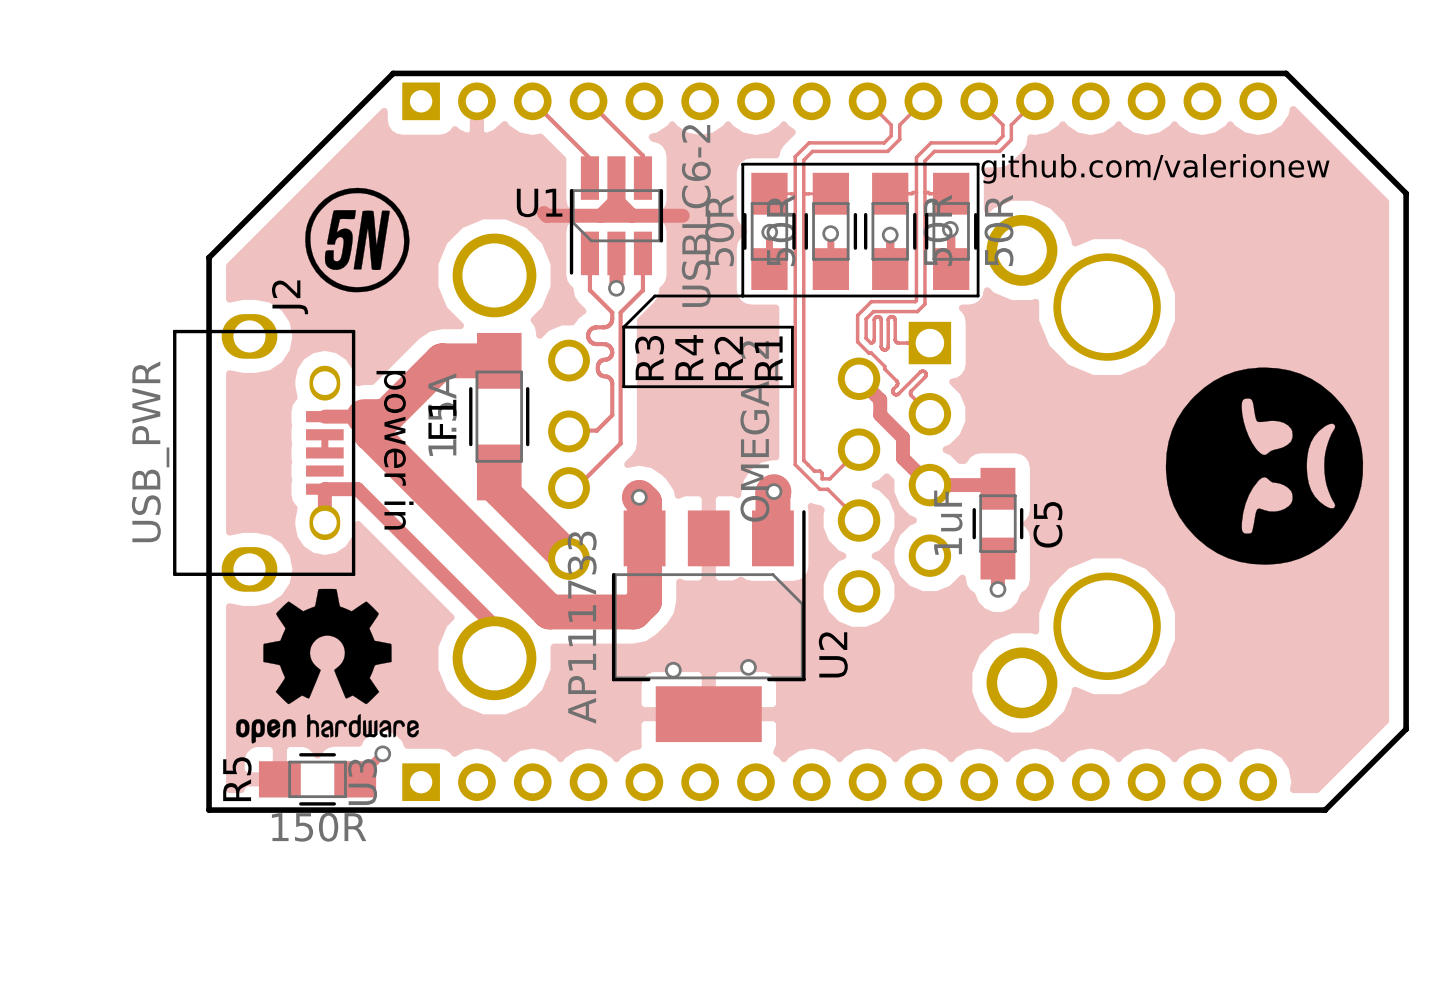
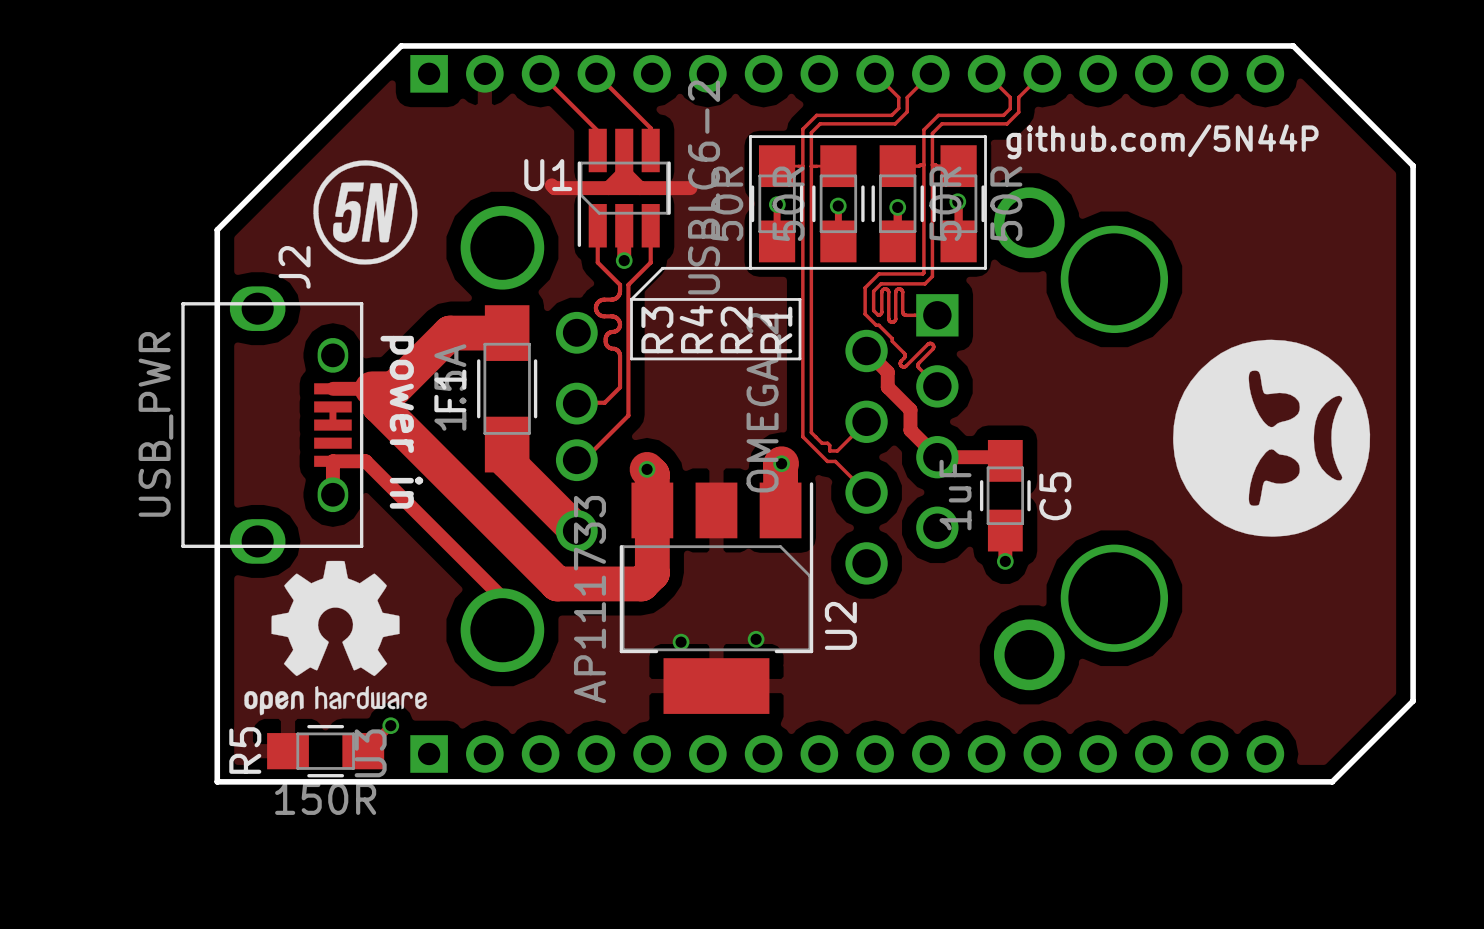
text: github.com/valerionew (1155, 168) -> github.com/5N44P (1162, 141)

